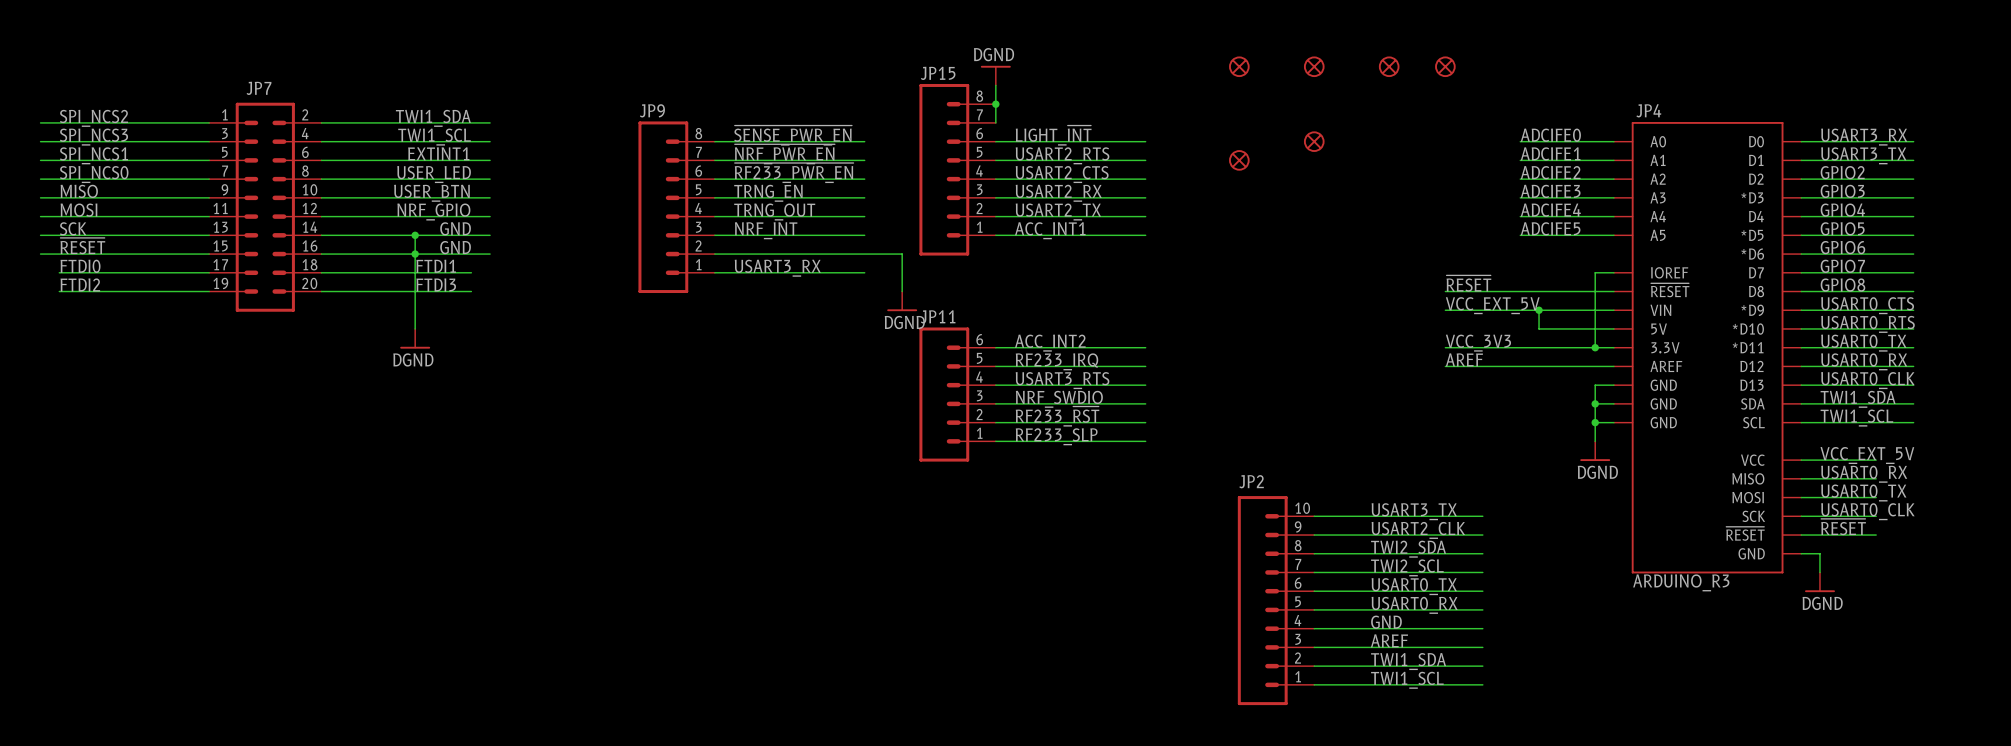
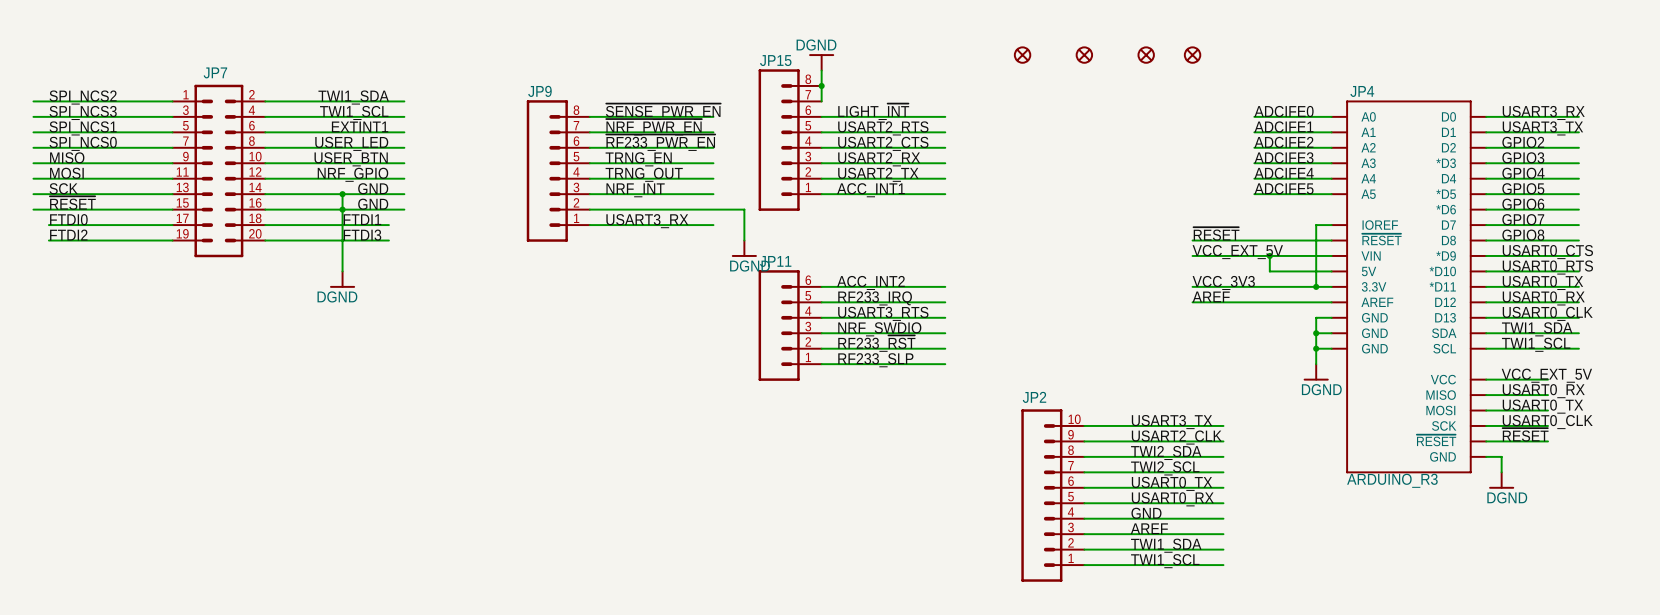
part: (1314, 141) -> none
part: (1239, 160) -> none

